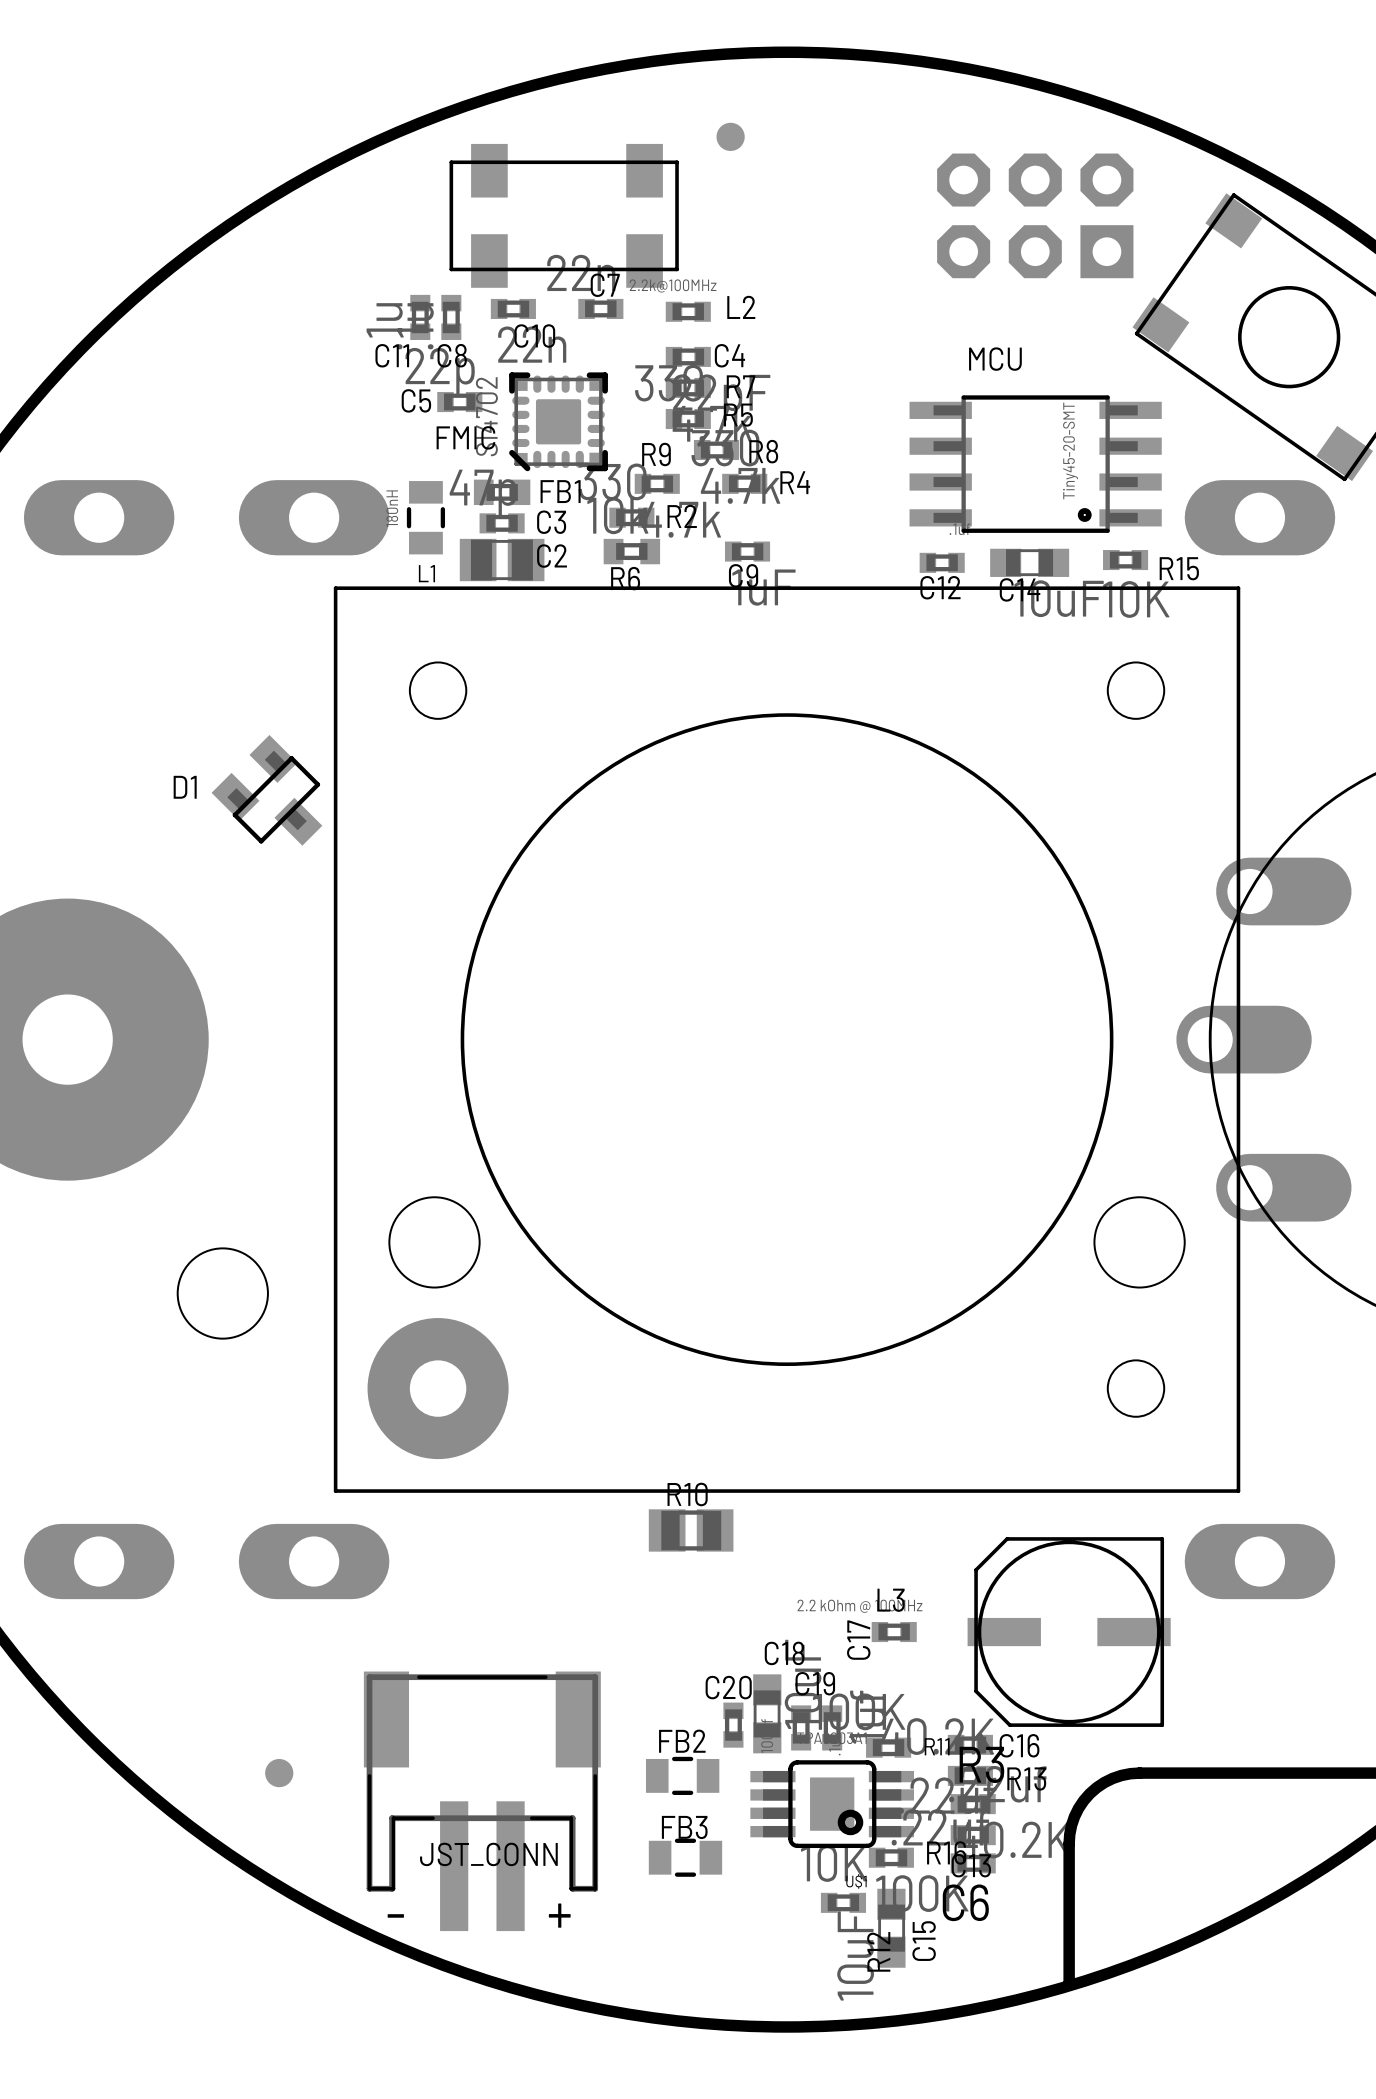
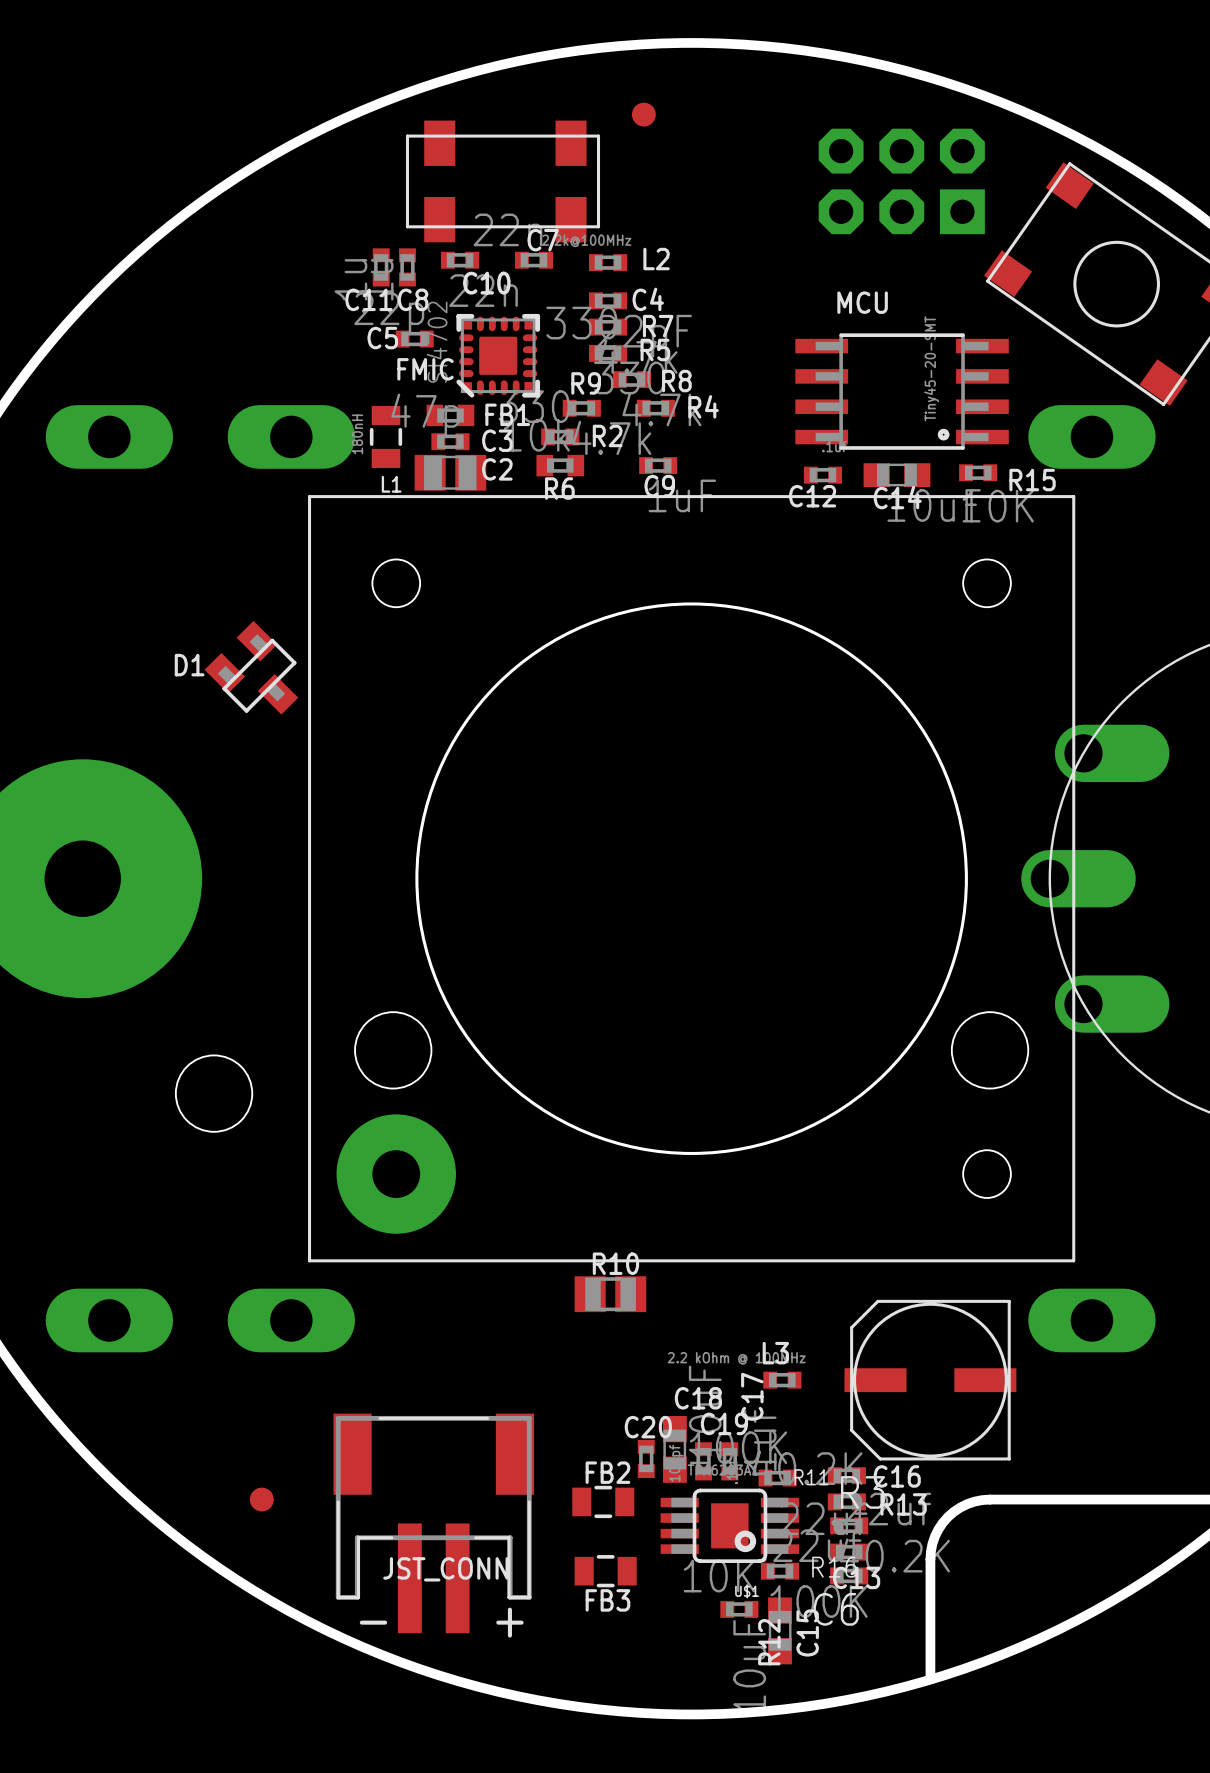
FB3 name position: FB3 (684, 1827) -> FB3 (607, 1600)

